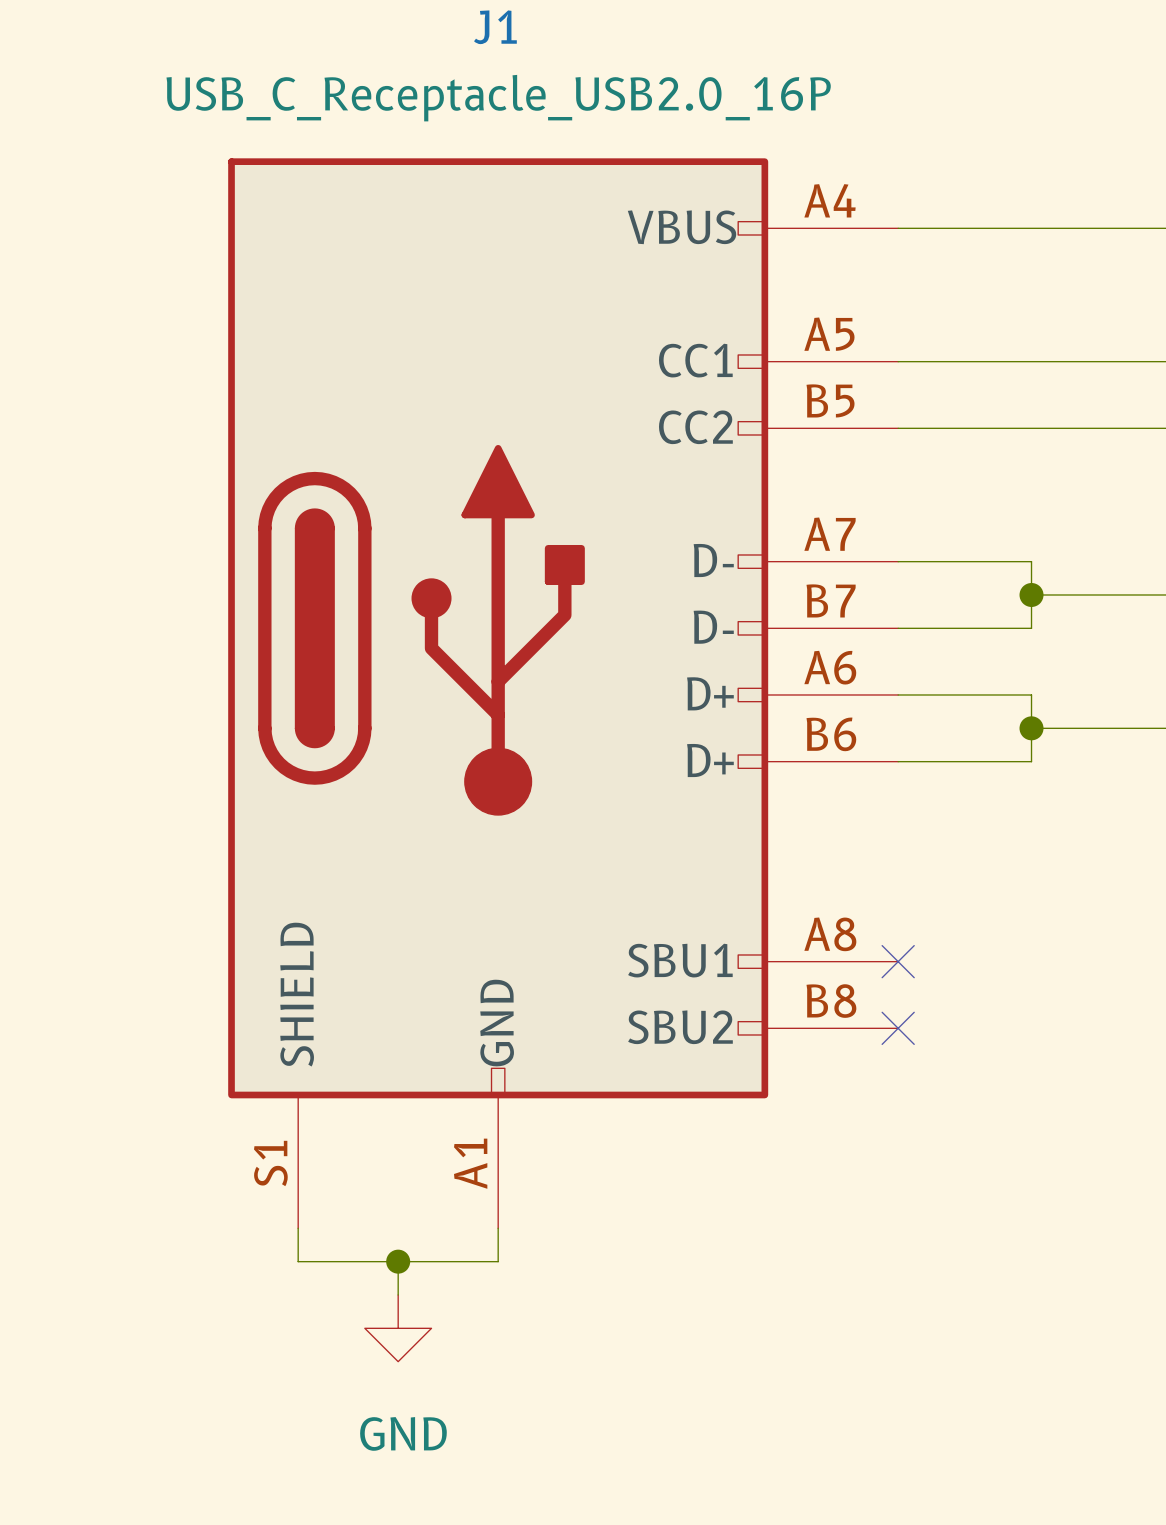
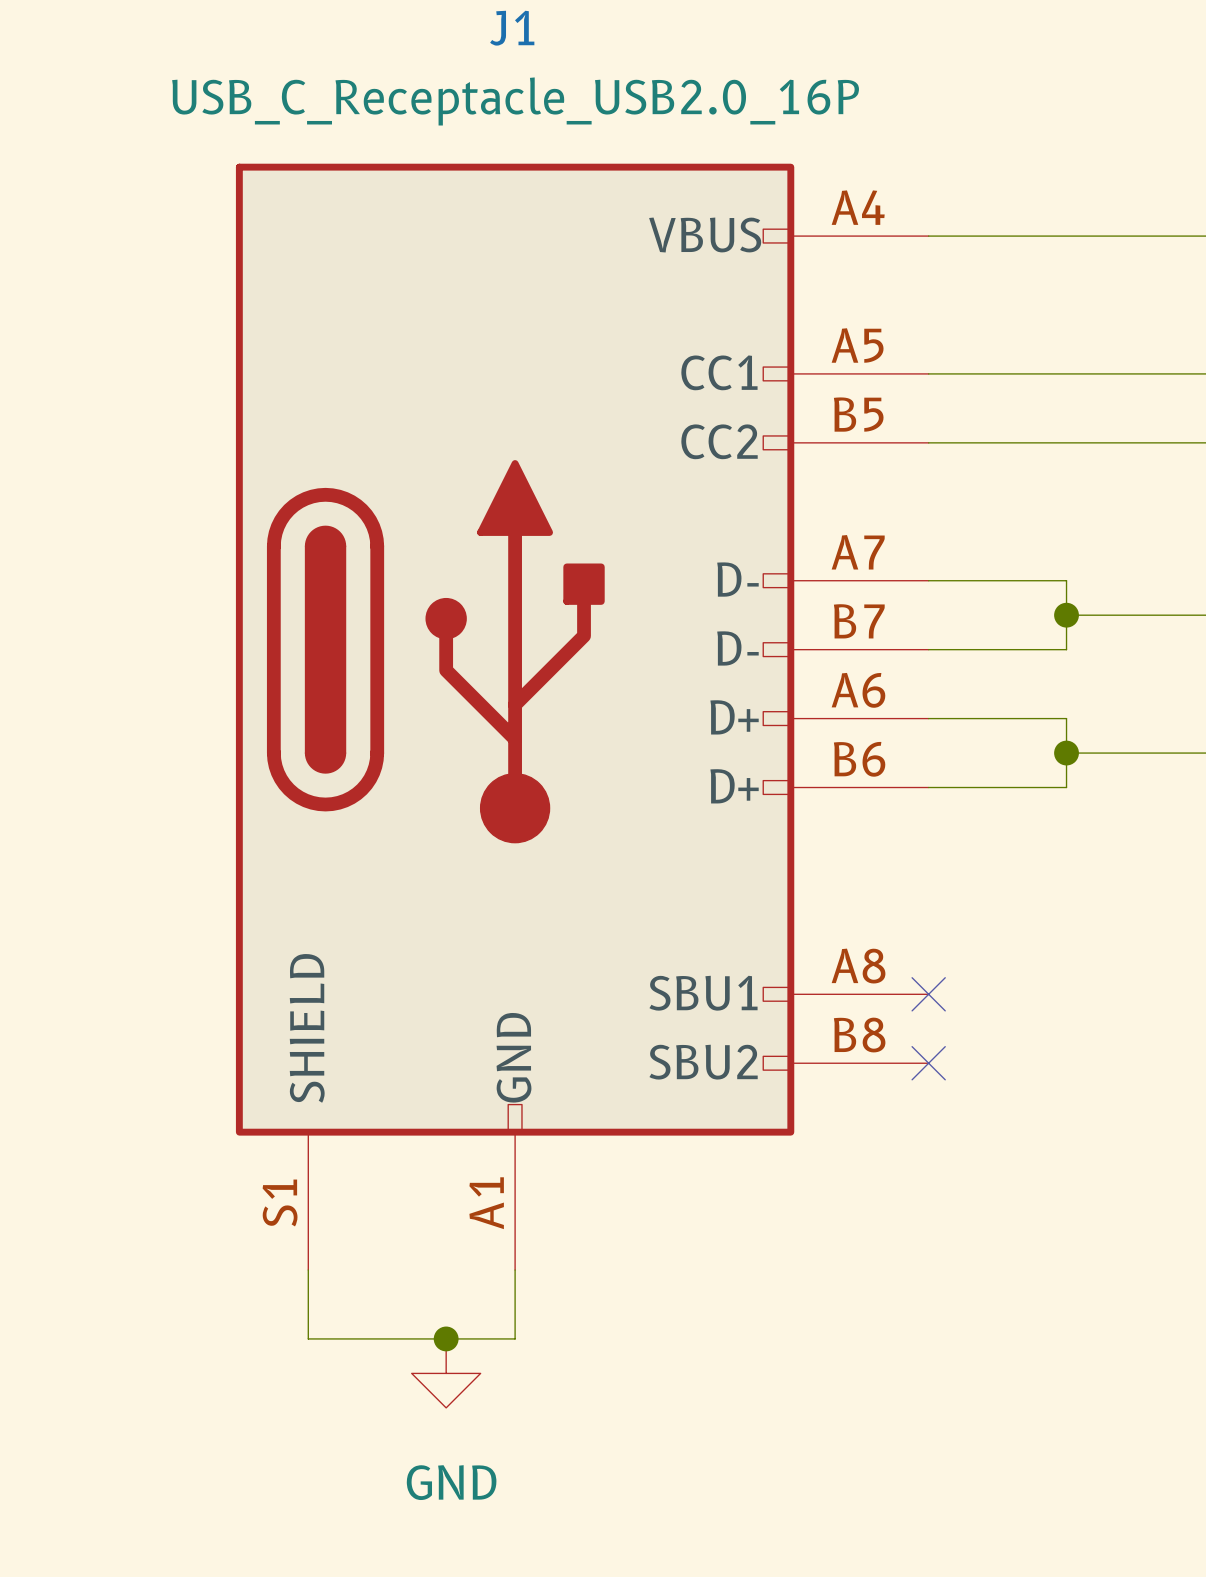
wire: (298, 1261) (498, 1261) -> (308, 1304) (308, 1338) (515, 1338) (515, 1304)
wire: (398, 1261) (398, 1294) -> none
junction position: (398, 1261) -> (446, 1338)
power symbol position: GND (398, 1328) -> GND (446, 1373)

